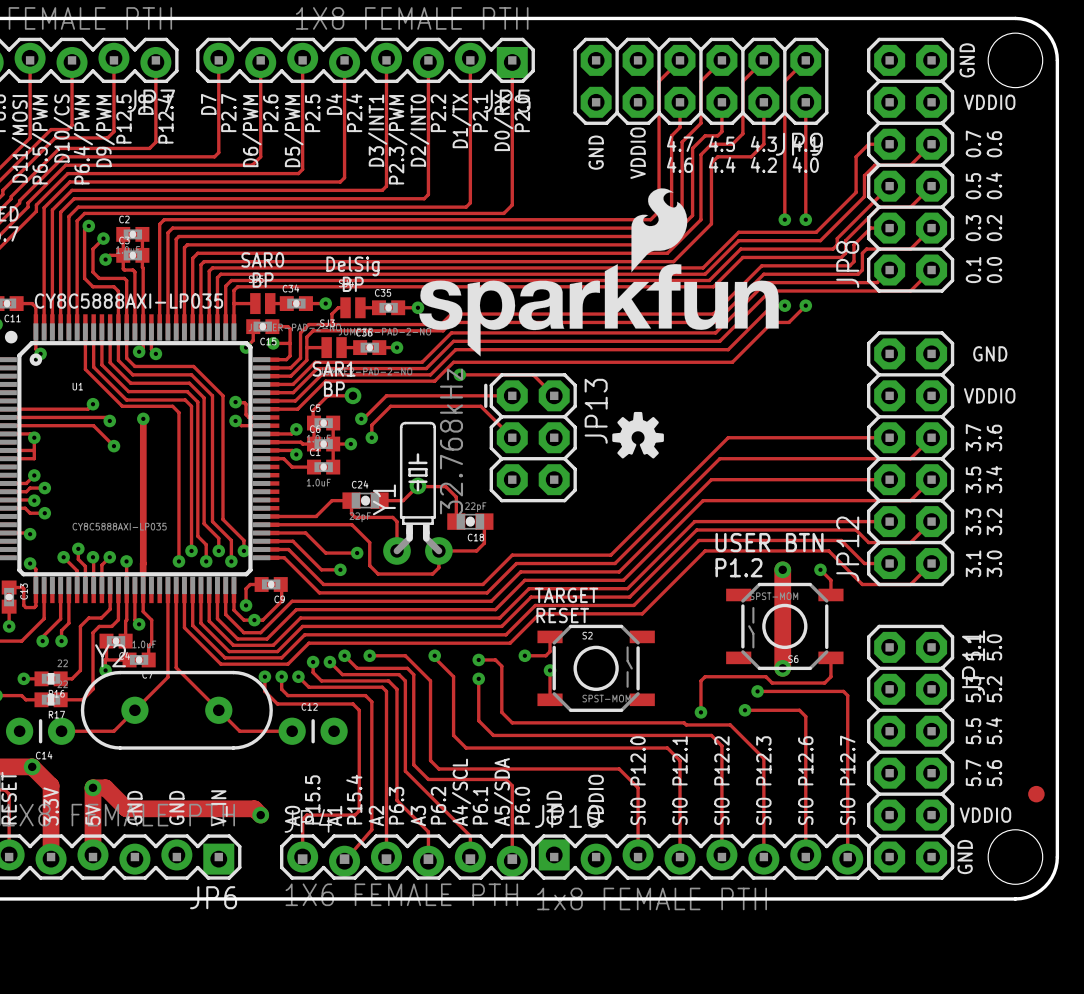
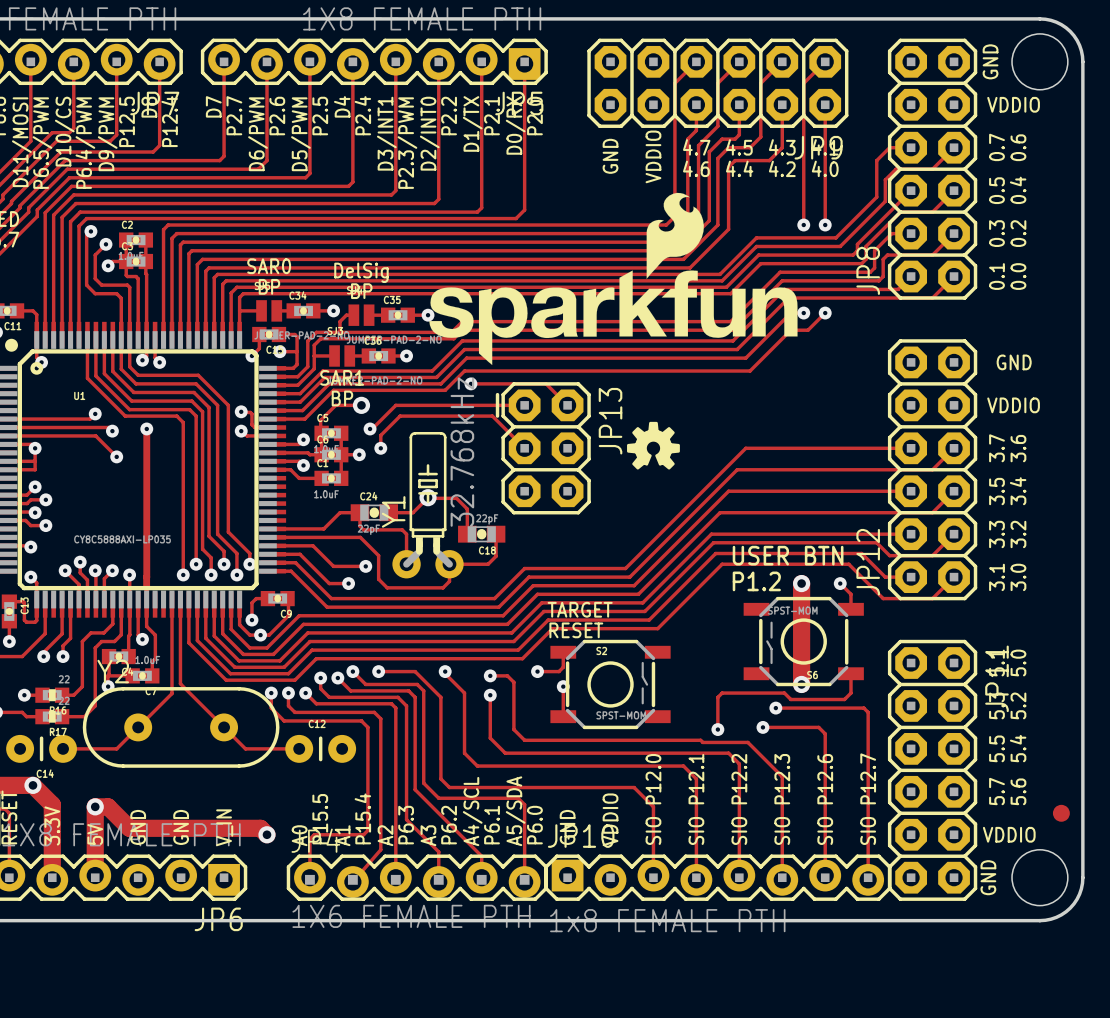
text: CY8C5888AXI-LP035 (128, 301) -> none

